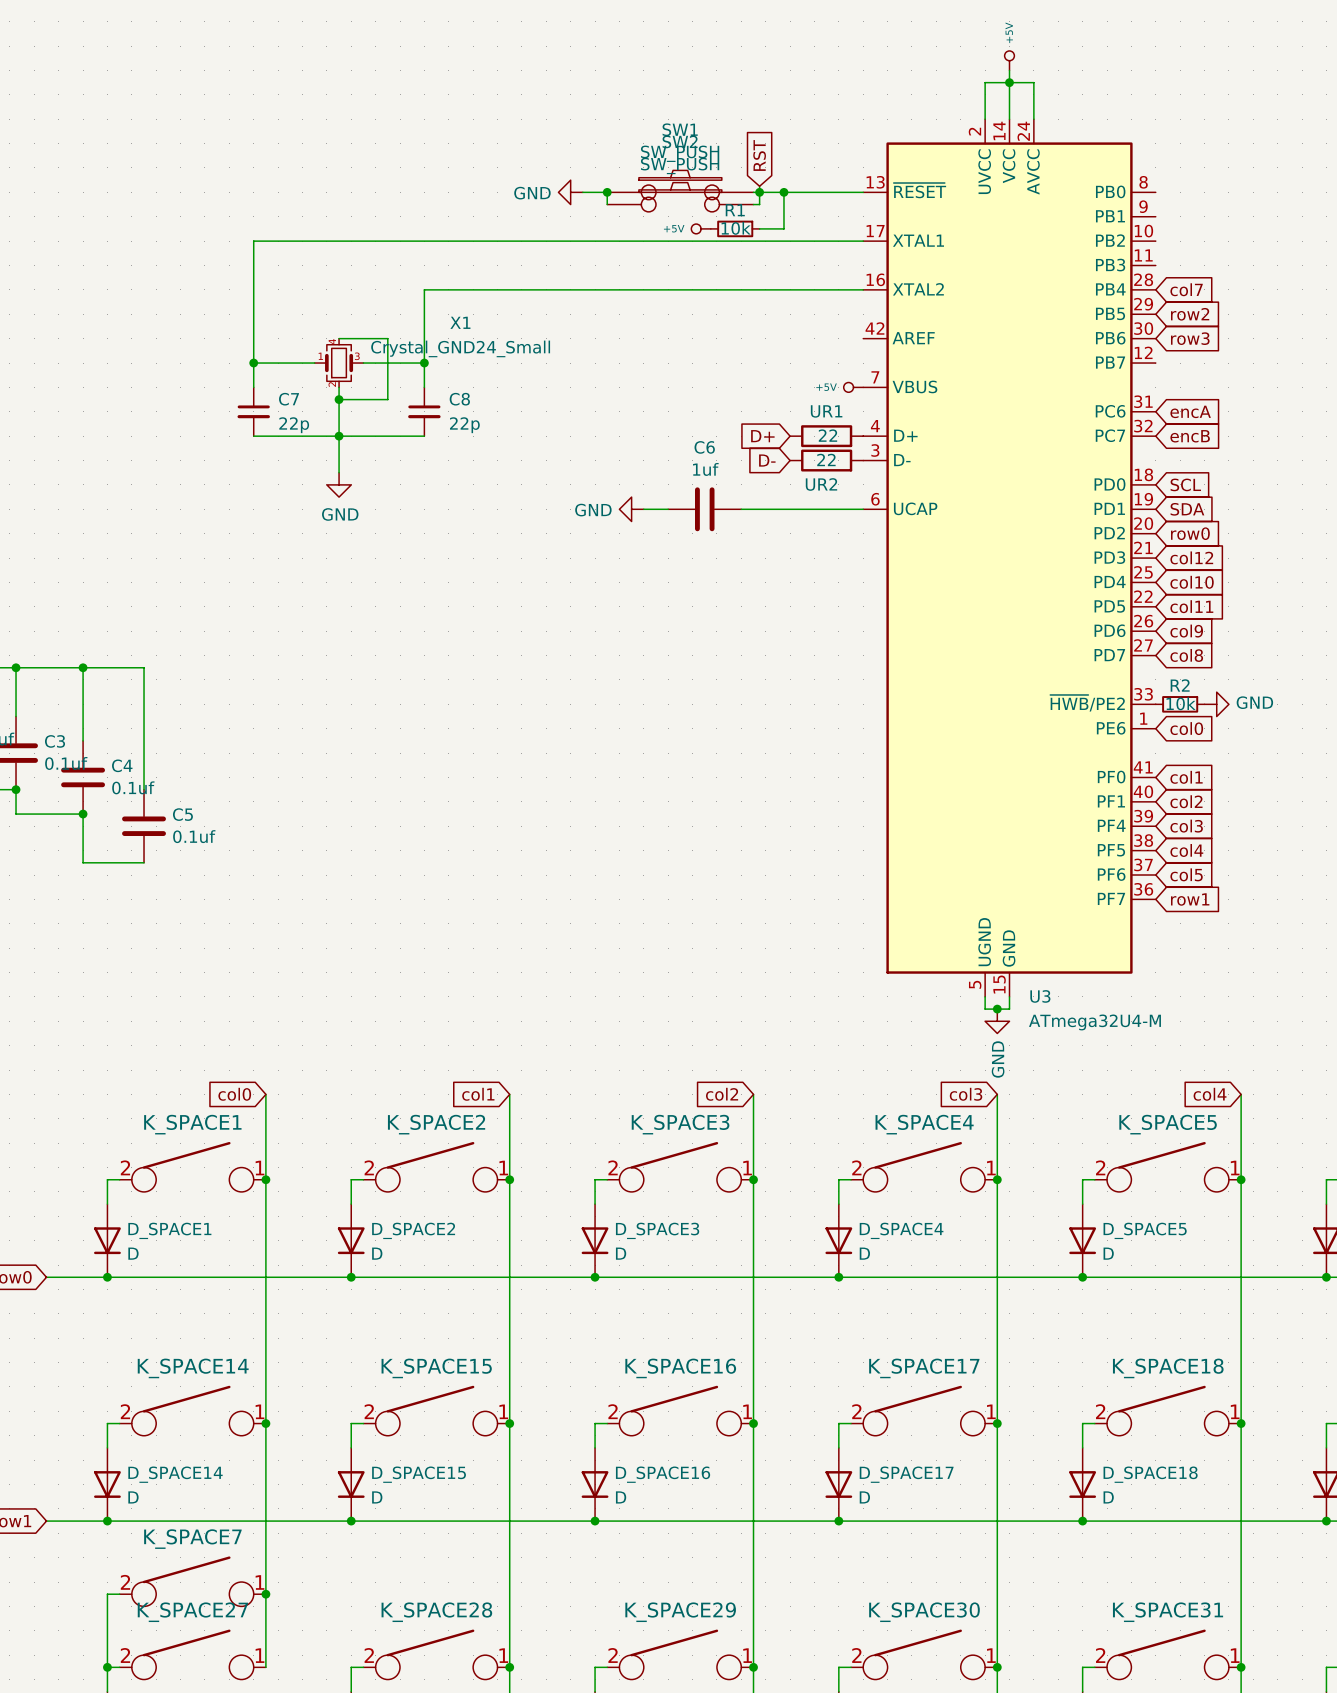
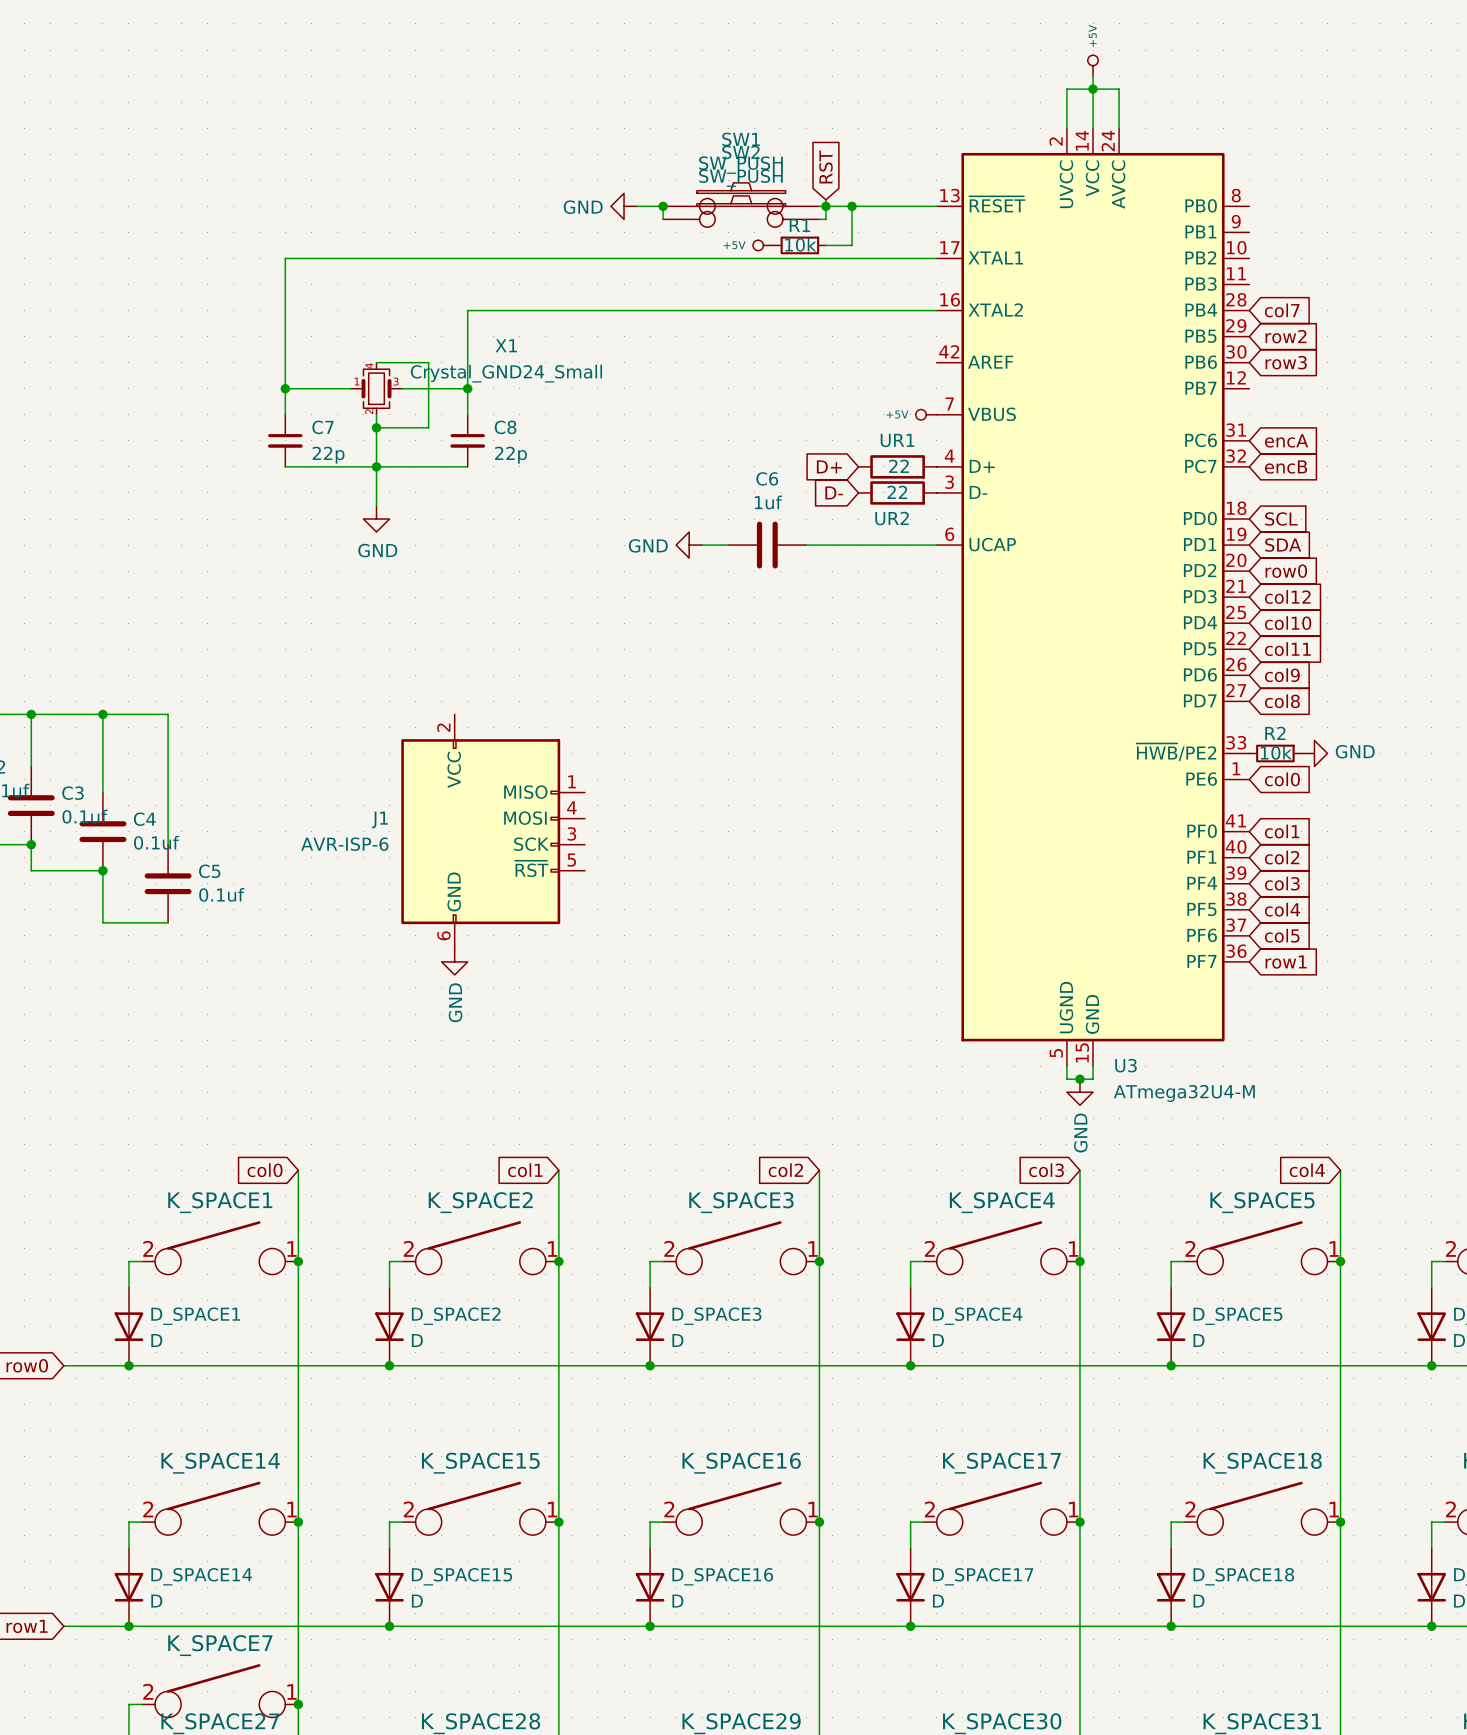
J1: none -> AVR-ISP-6 (493, 831)
power symbol: none -> GND (454, 961)

